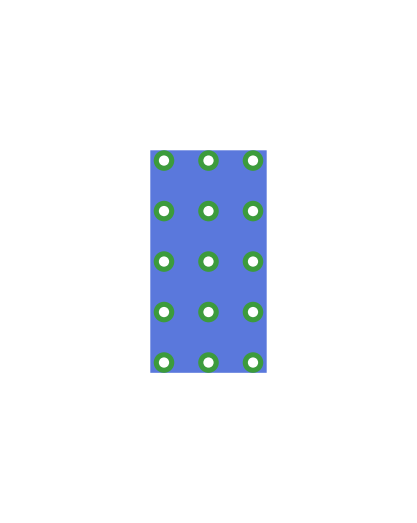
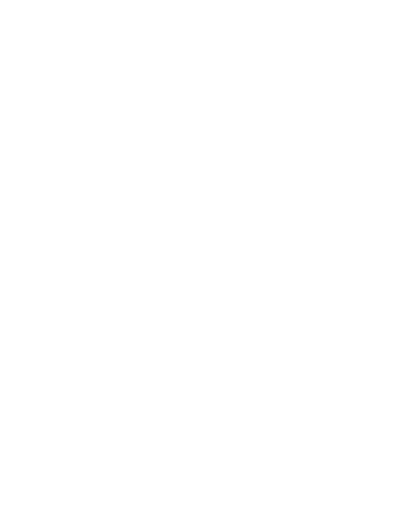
part: (208, 261) -> none

